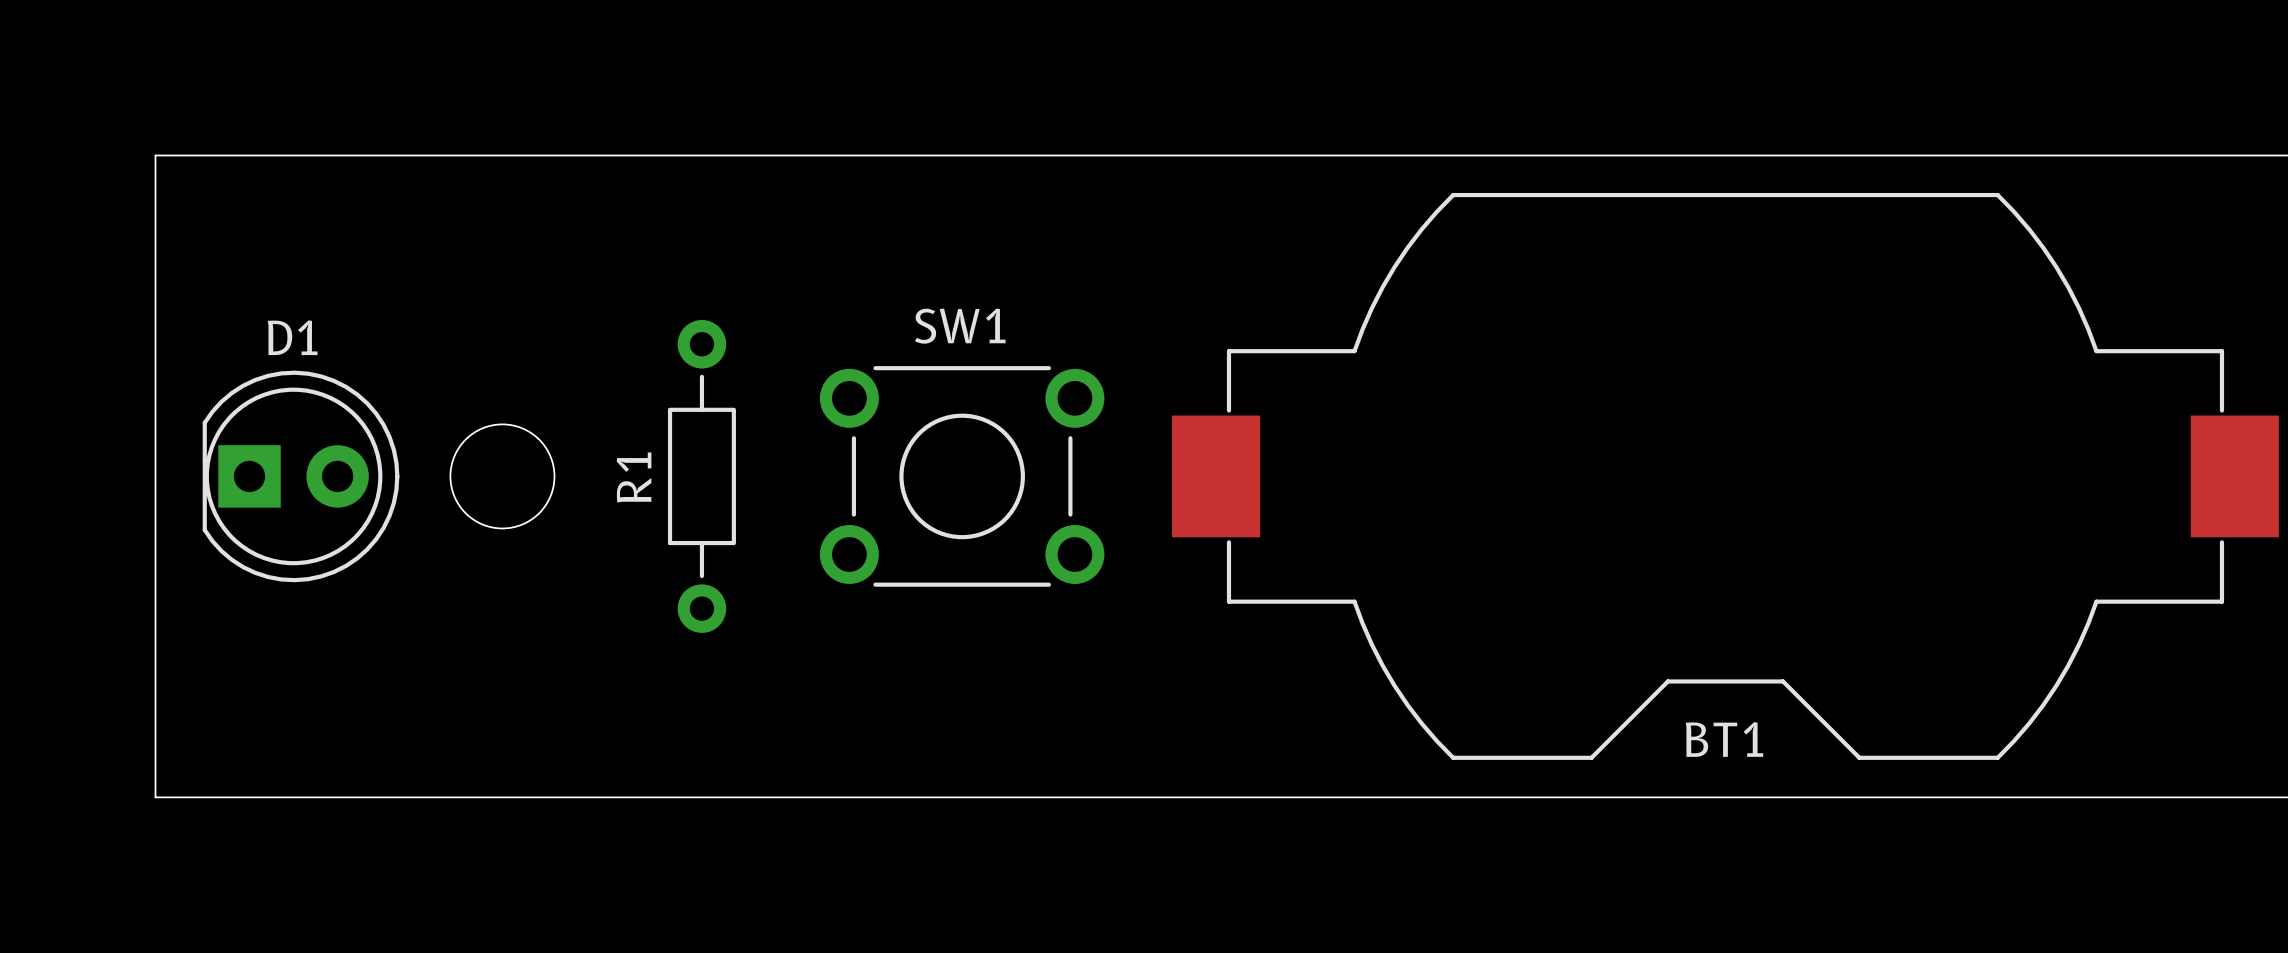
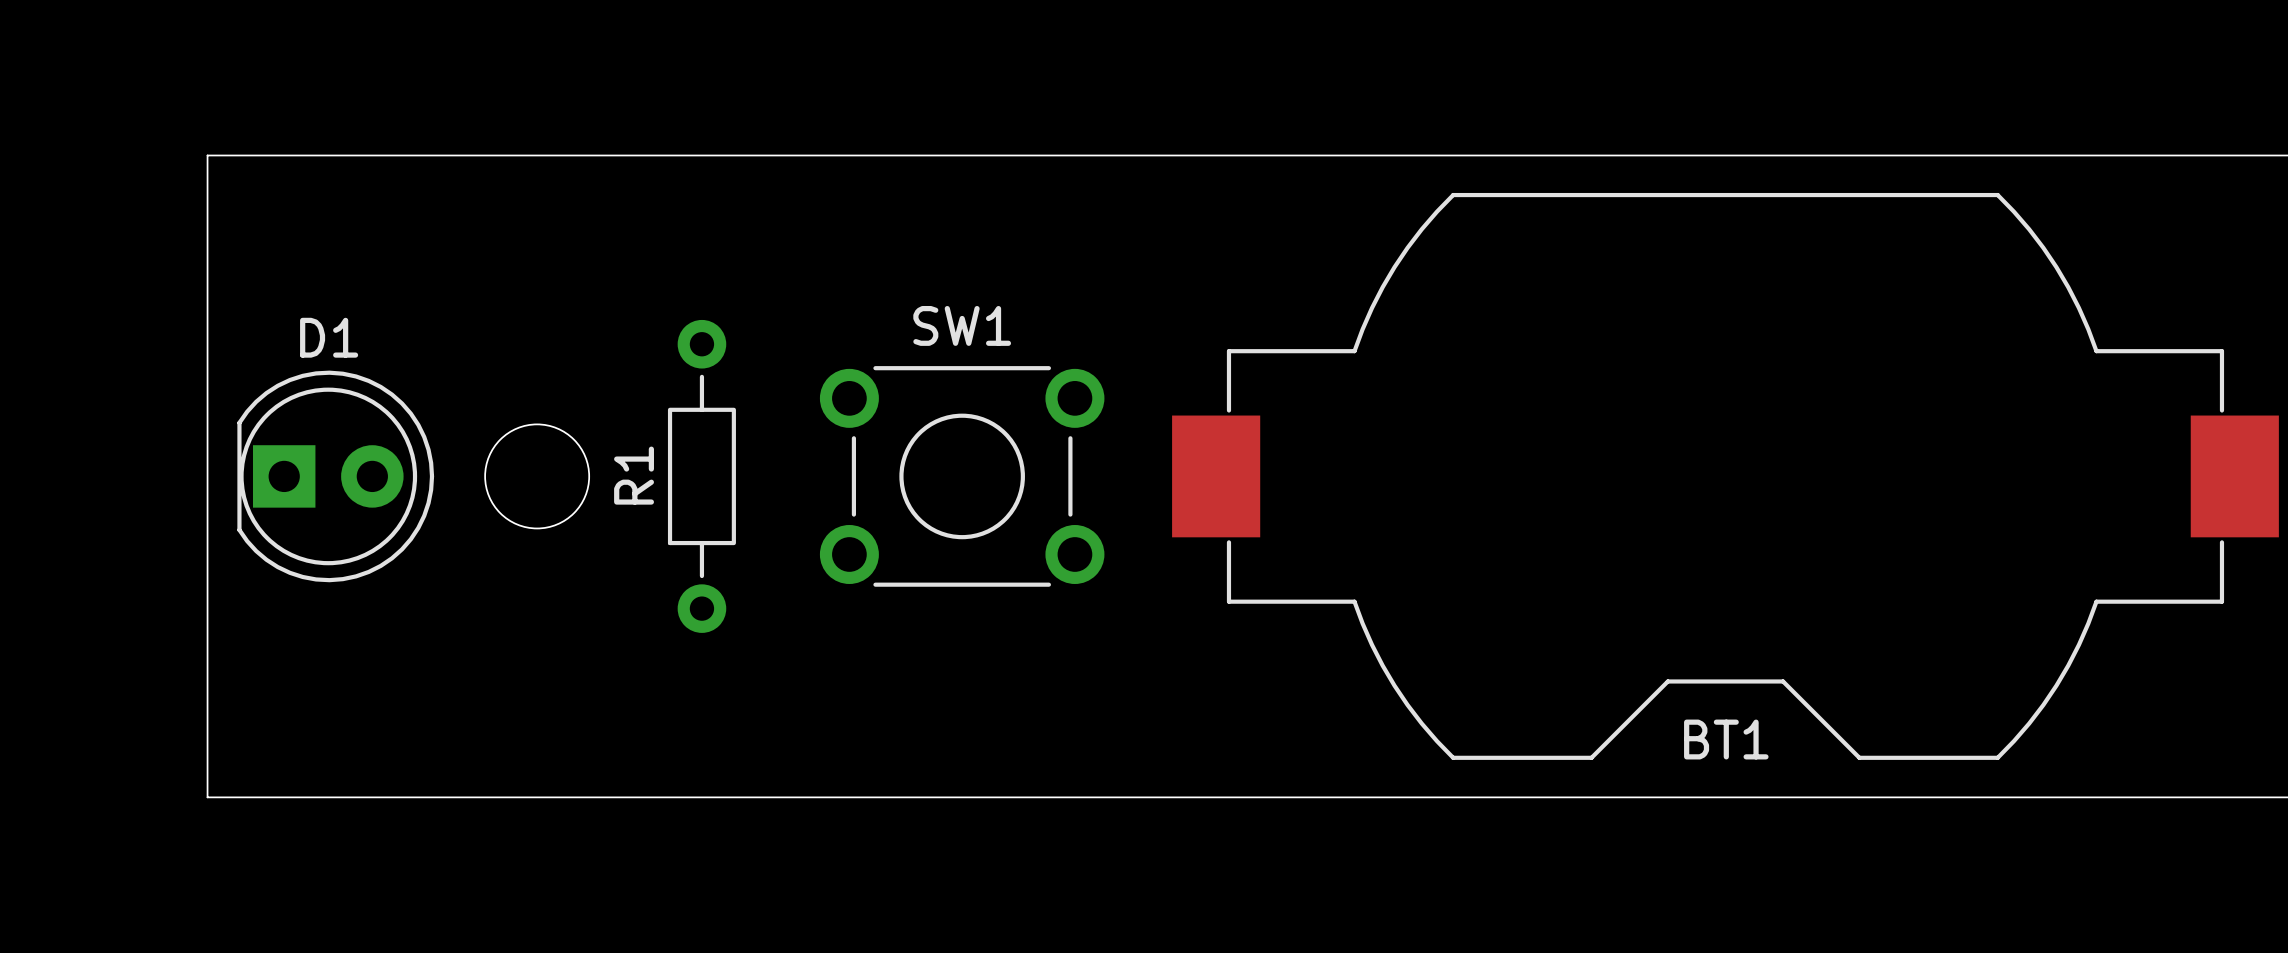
board edge: (207, 155) (155, 155) (155, 797) (207, 797) -> (207, 155) (207, 797)
D1 position: (301, 476) -> (335, 476)
round board edge position: (502, 476) -> (537, 476)

